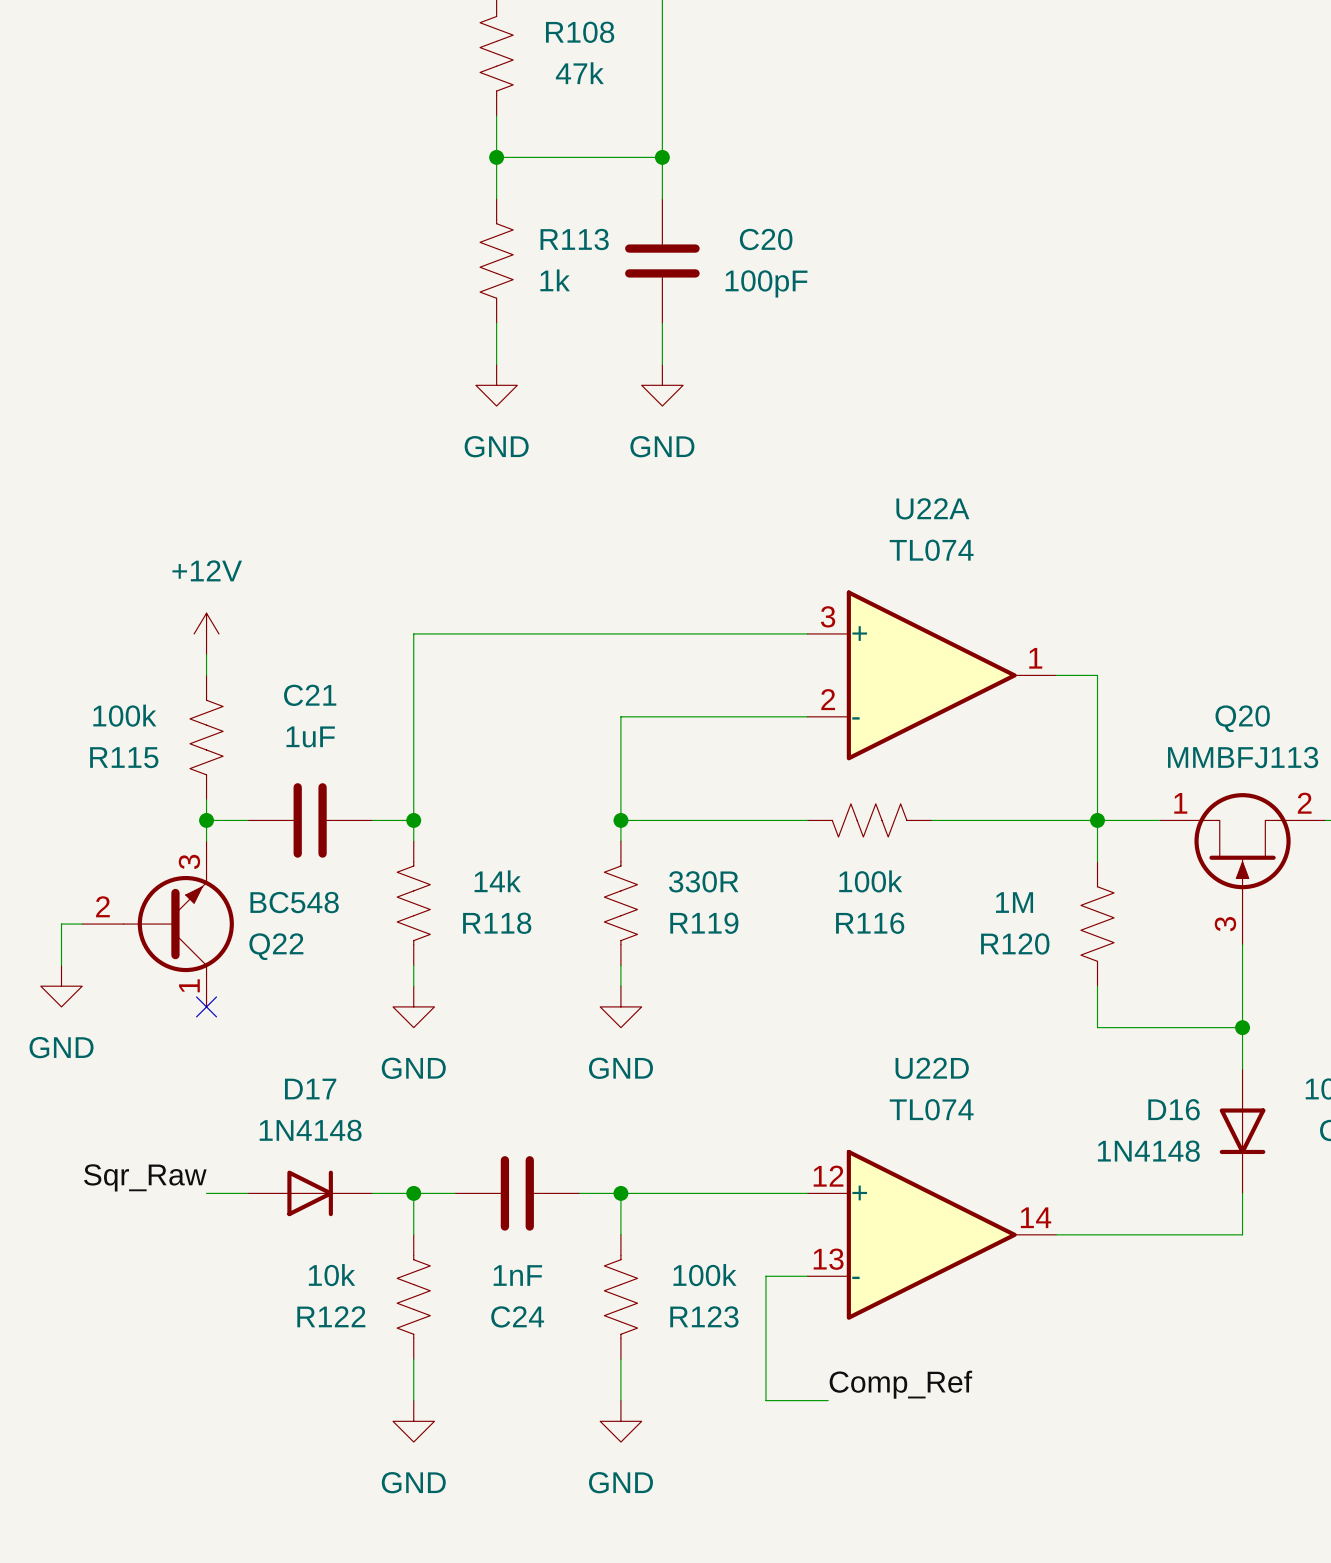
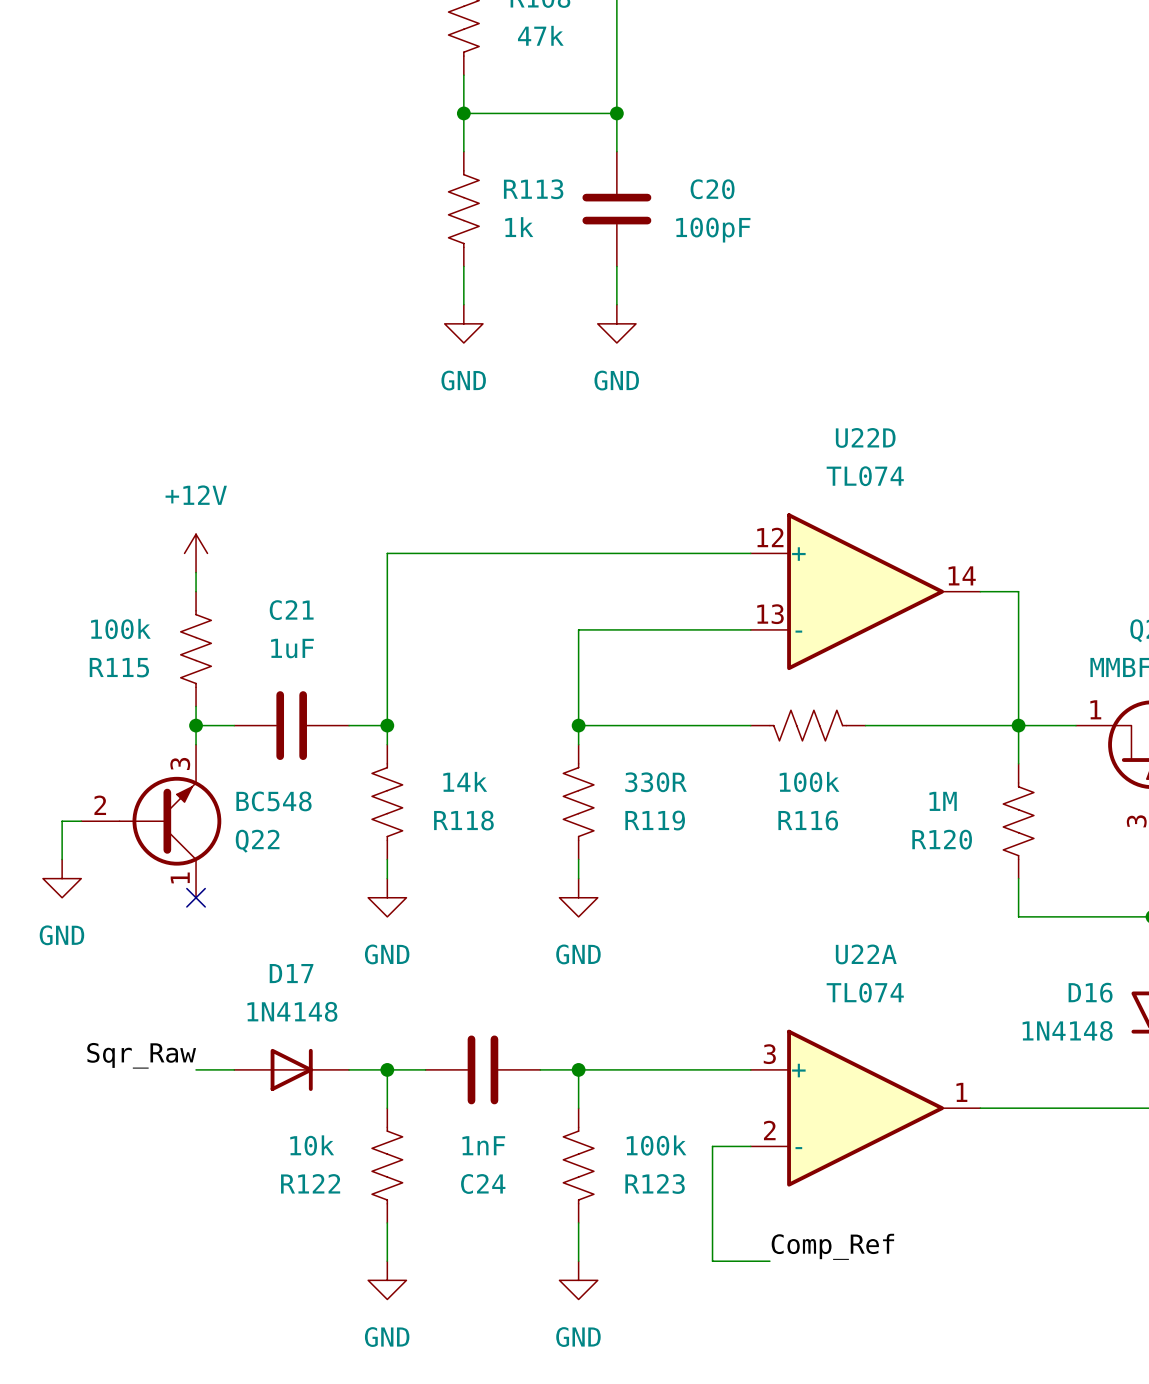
U22A position: (931, 675) -> (865, 1108)
U22D position: (931, 1234) -> (865, 591)

